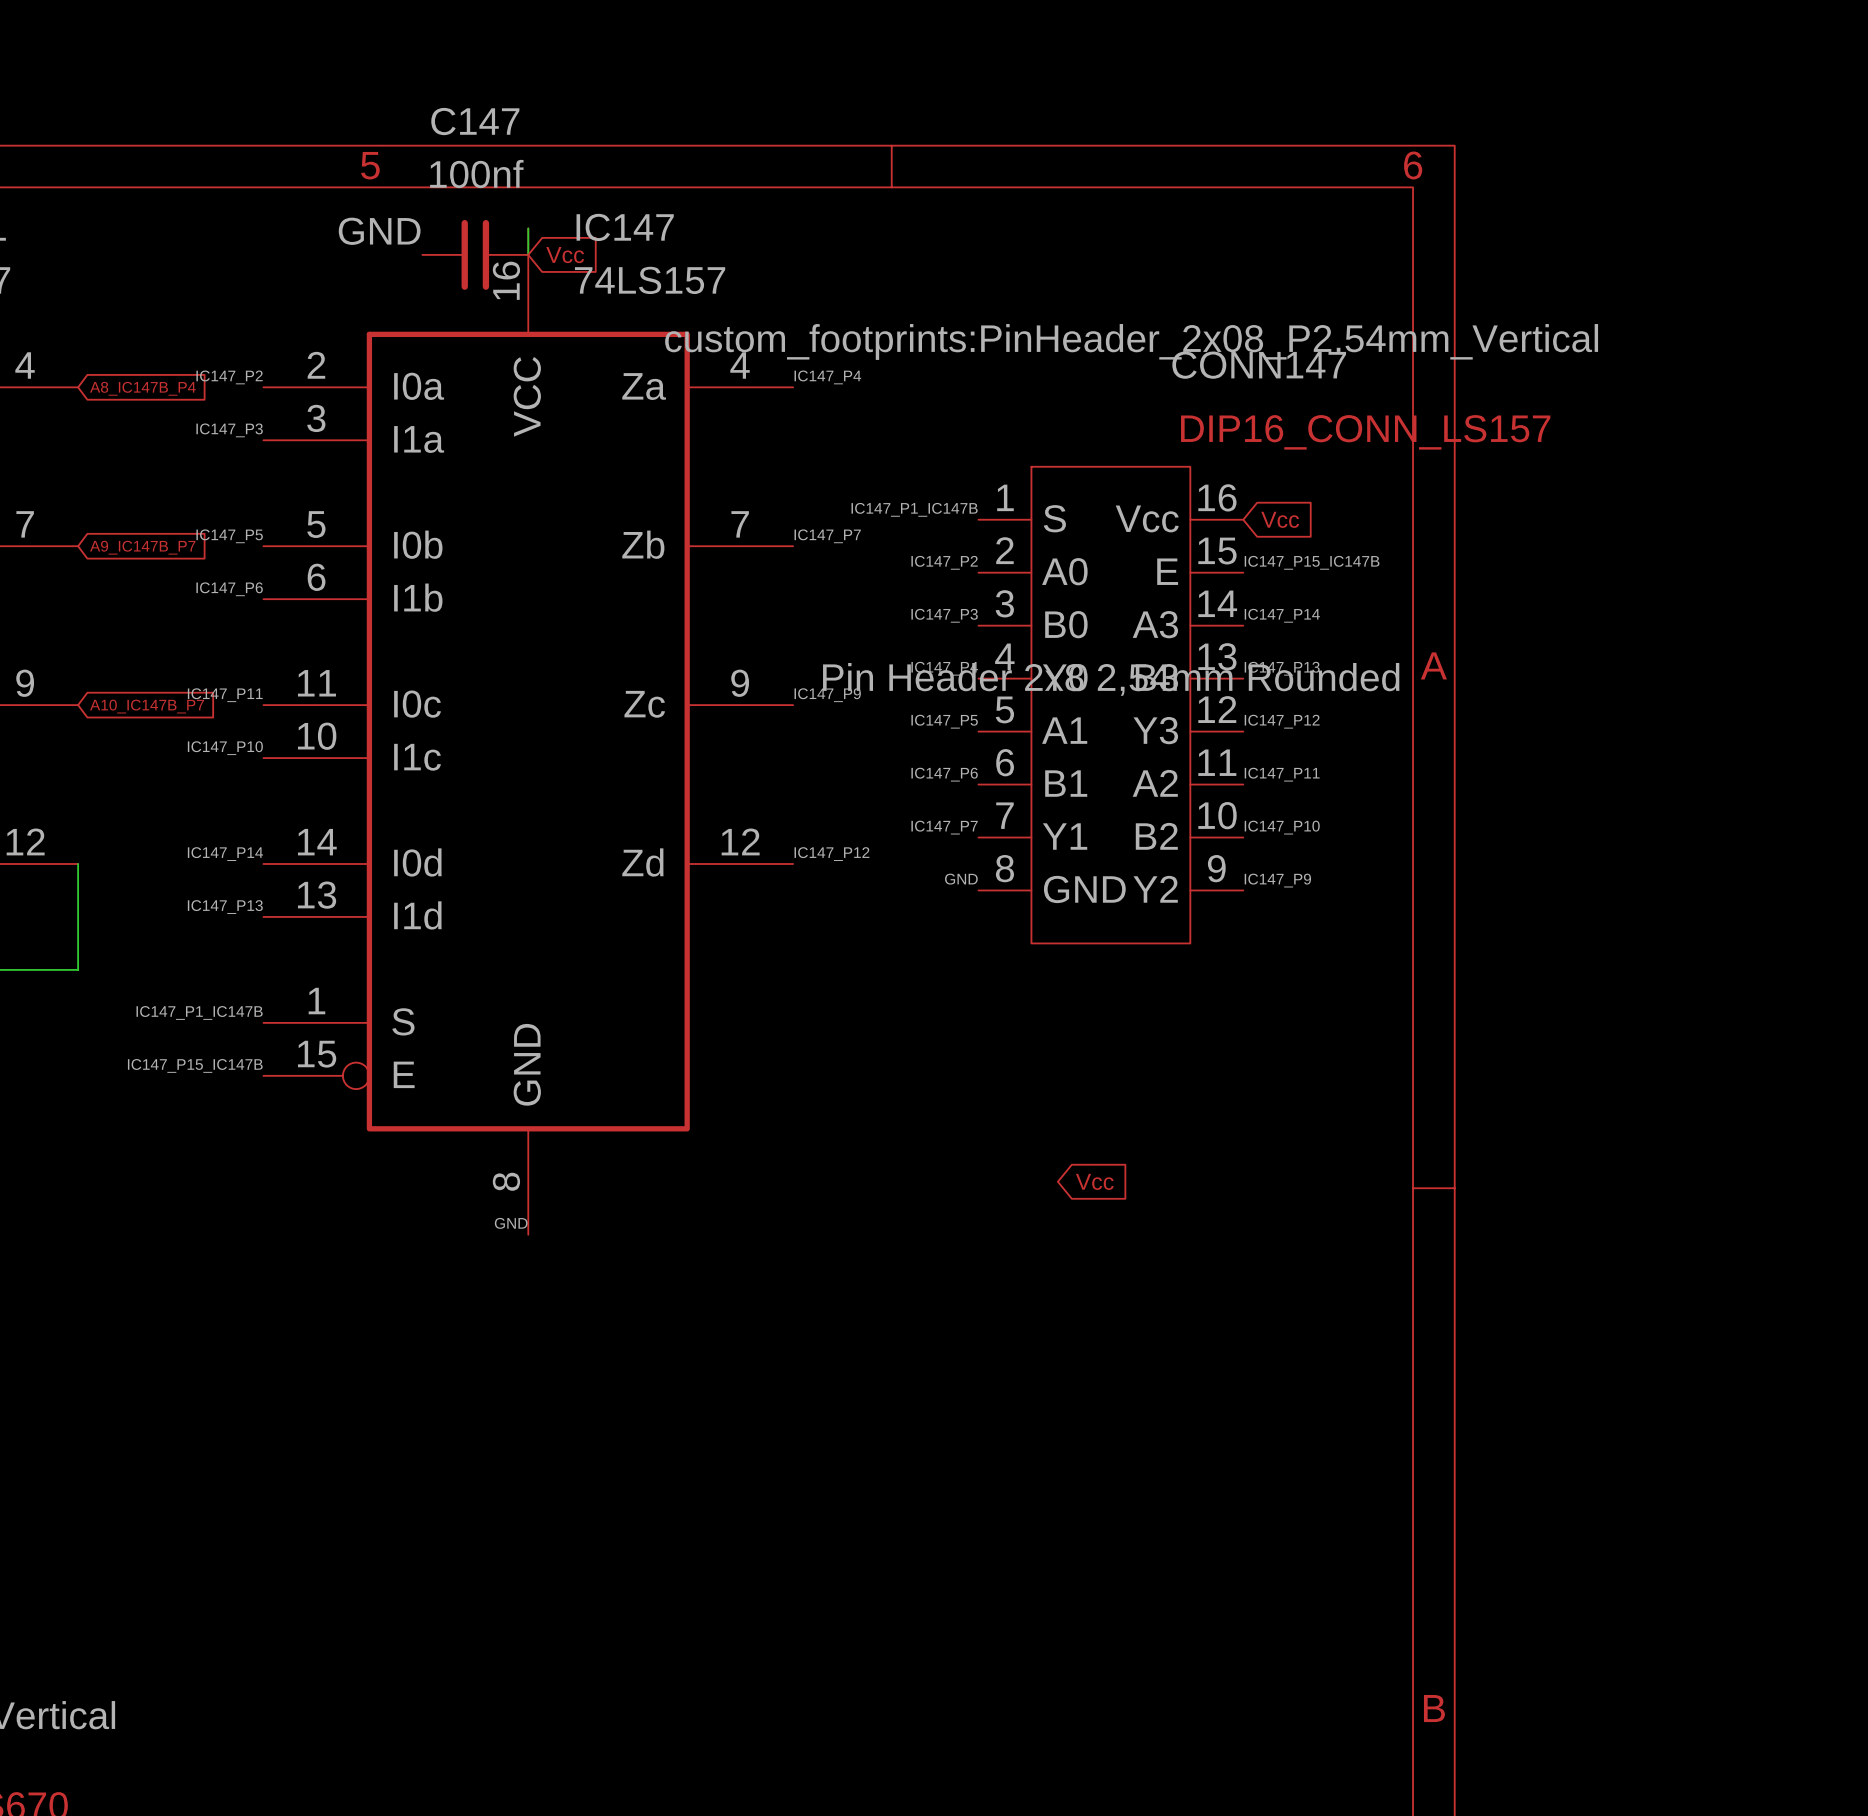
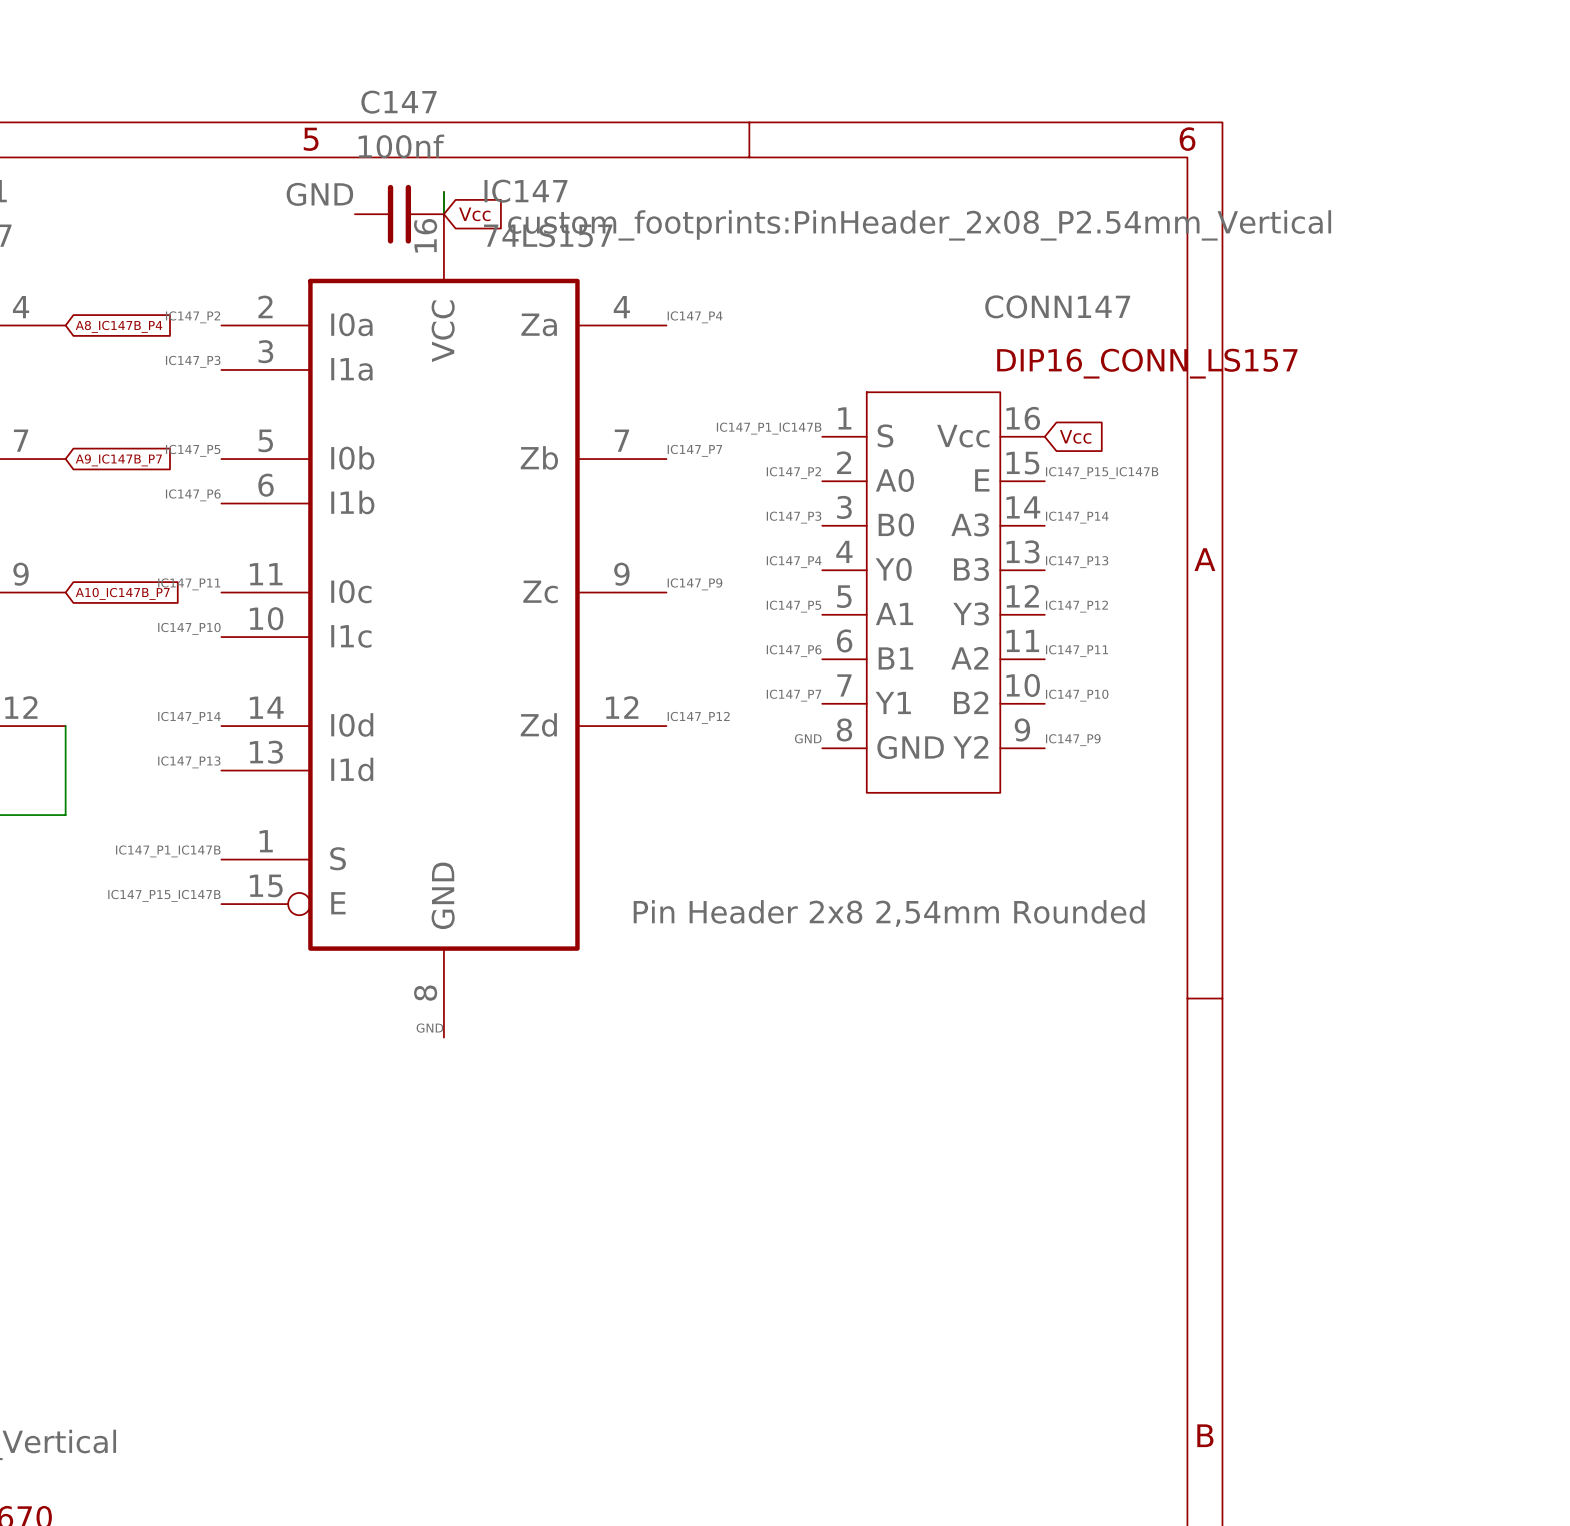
CONN147 text position: custom_footprints:PinHeader_2x08_P2.54mm_Vertical (1131, 341) -> custom_footprints:PinHeader_2x08_P2.54mm_Vertical (919, 225)
CONN147 value position: Pin Header 2x8 2,54mm Rounded (1111, 679) -> Pin Header 2x8 2,54mm Rounded (889, 913)
global label: Vcc (1094, 1181) -> none

